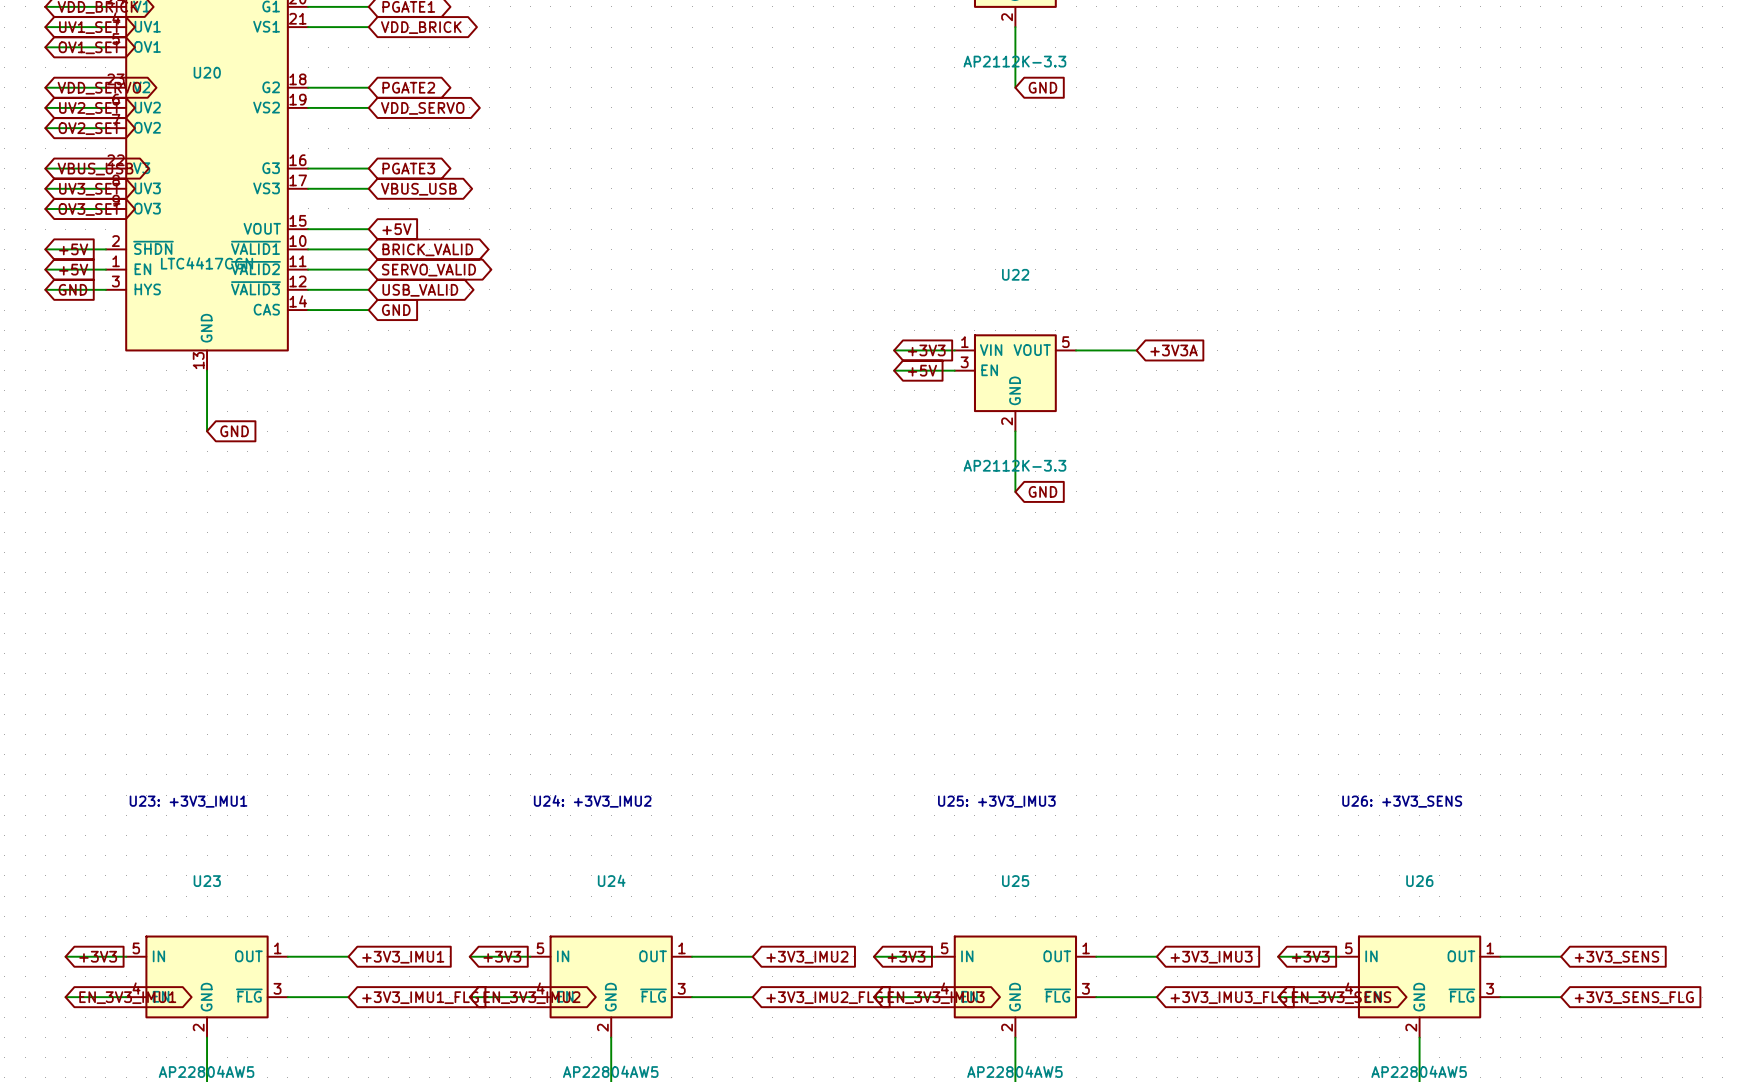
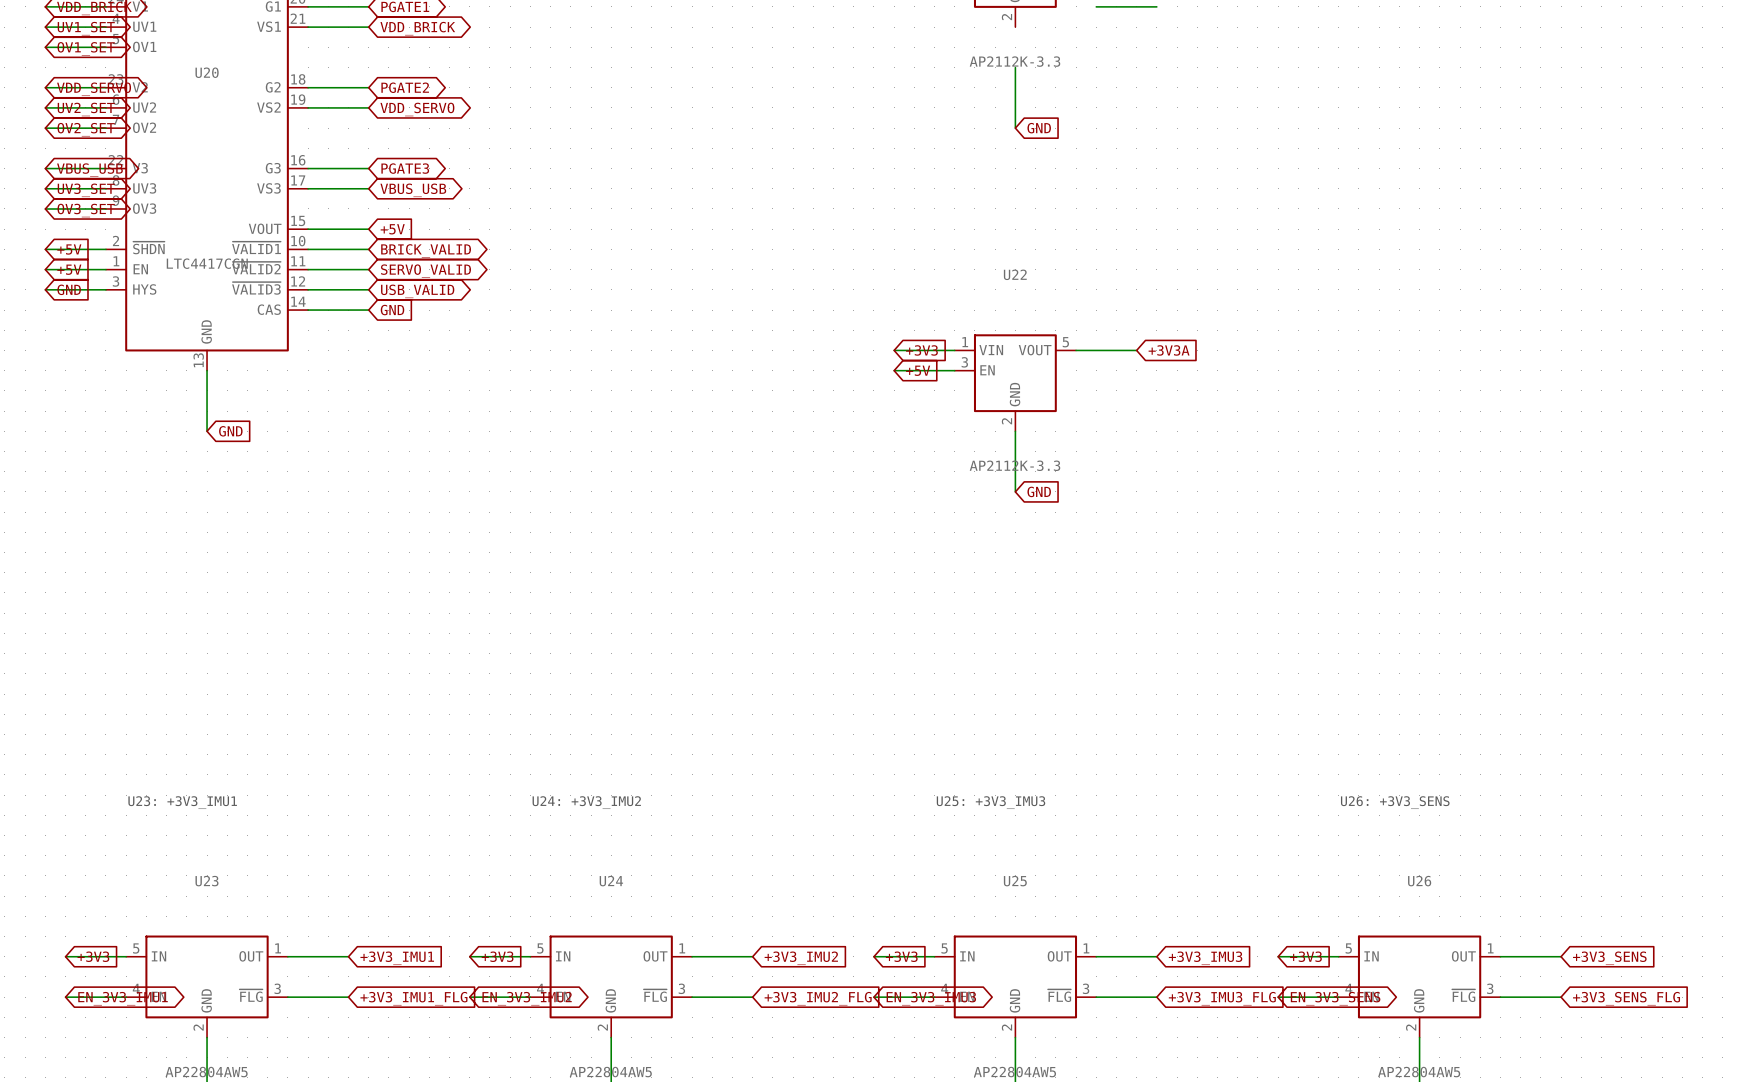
wire: none -> (1096, 6) (1156, 6)
wire: (1015, 27) (1015, 67) -> (1015, 87) (1015, 128)
global label position: GND (1042, 87) -> GND (1039, 128)

